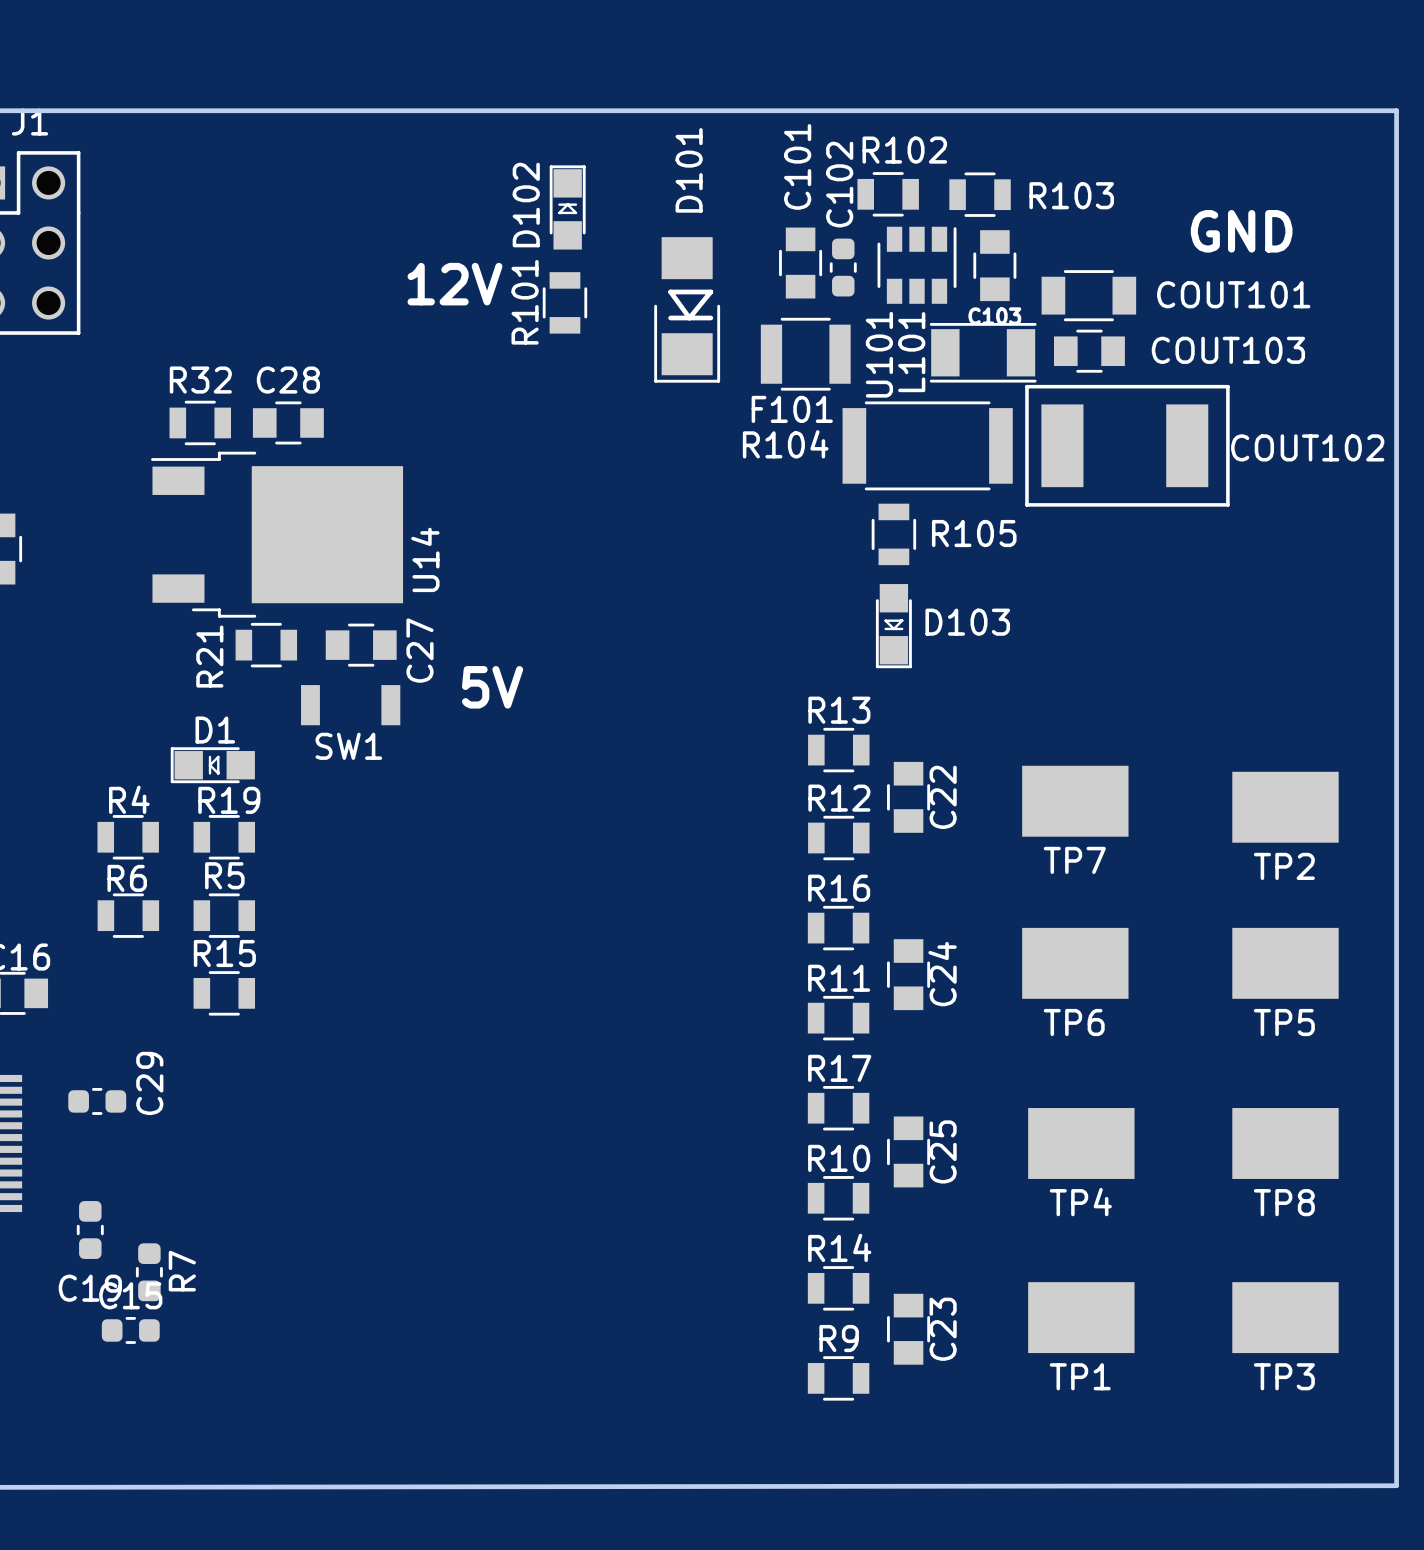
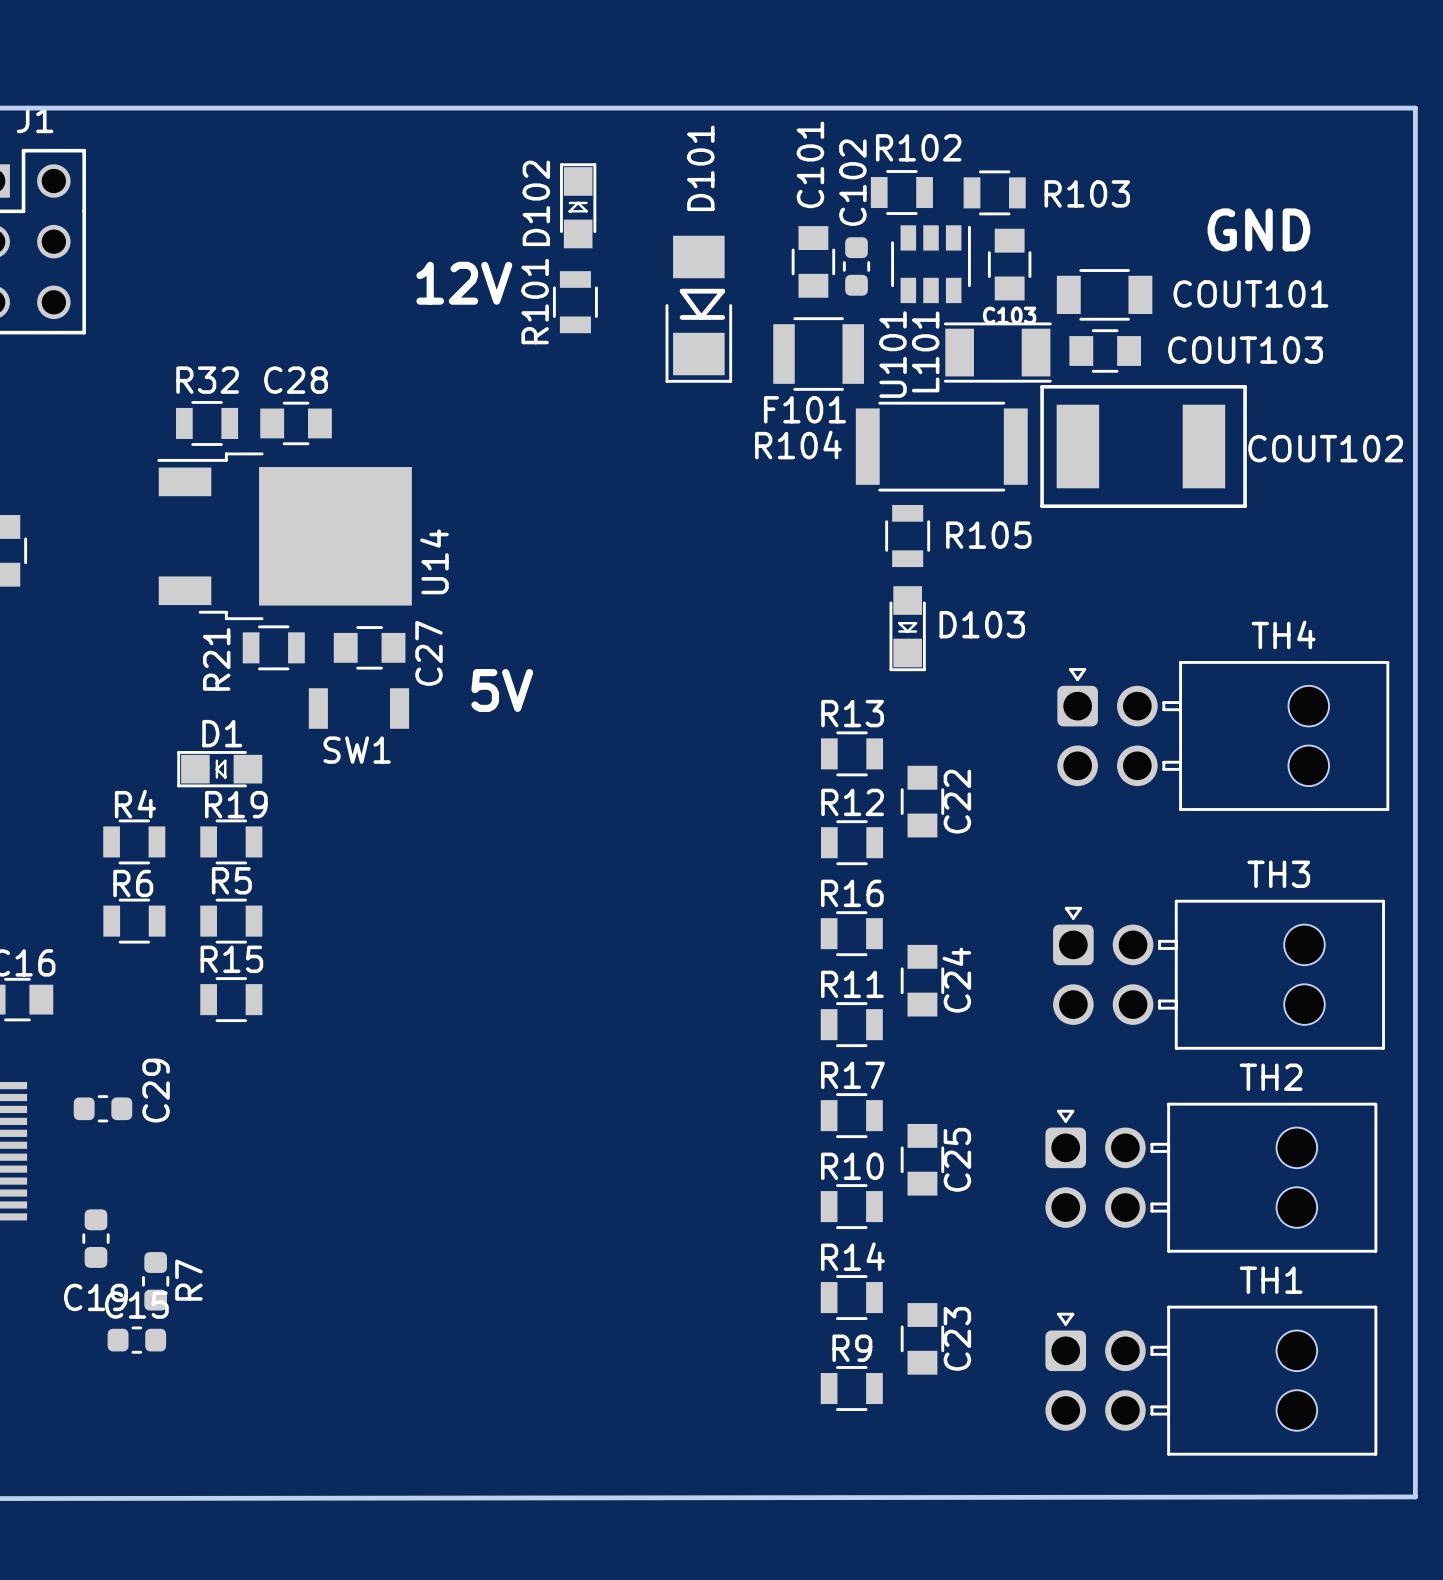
TH4: none -> (1223, 735)
TP7: (1075, 801) -> none
TP2: (1285, 807) -> none
TP6: (1075, 963) -> none
TP5: (1285, 963) -> none
TH3: none -> (1219, 974)
TP4: (1081, 1143) -> none
TP8: (1285, 1143) -> none
TH2: none -> (1211, 1177)
TP1: (1081, 1317) -> none
TP3: (1285, 1317) -> none
TH1: none -> (1211, 1380)

